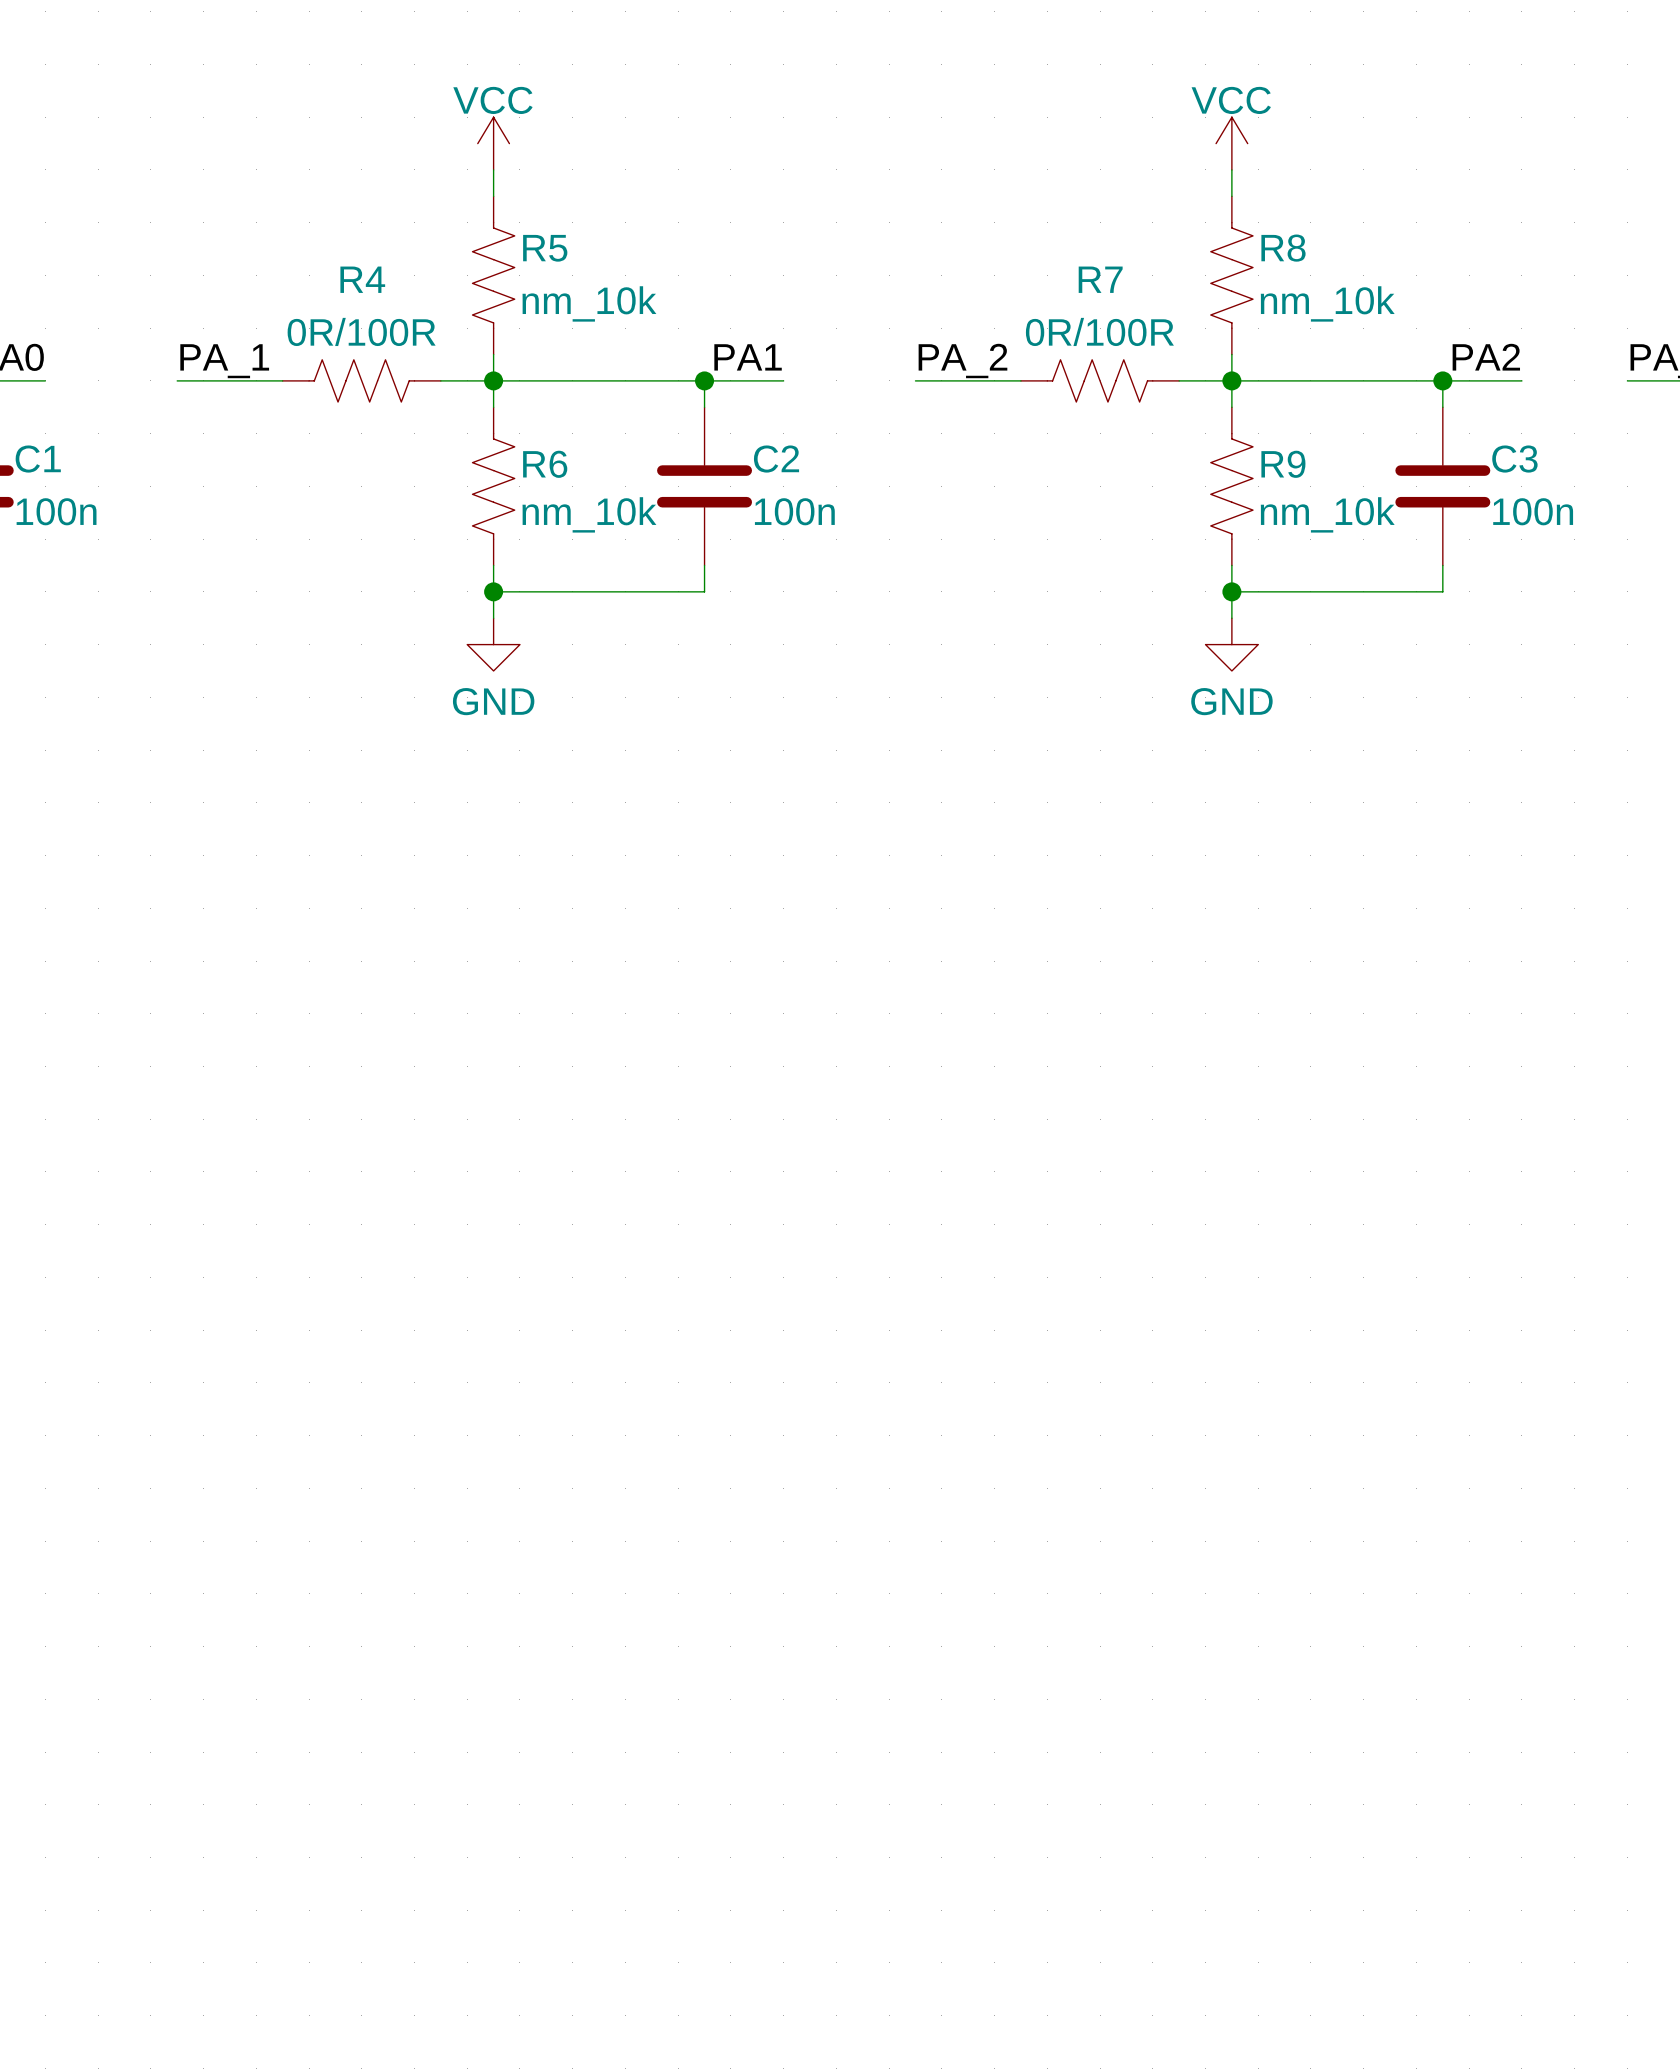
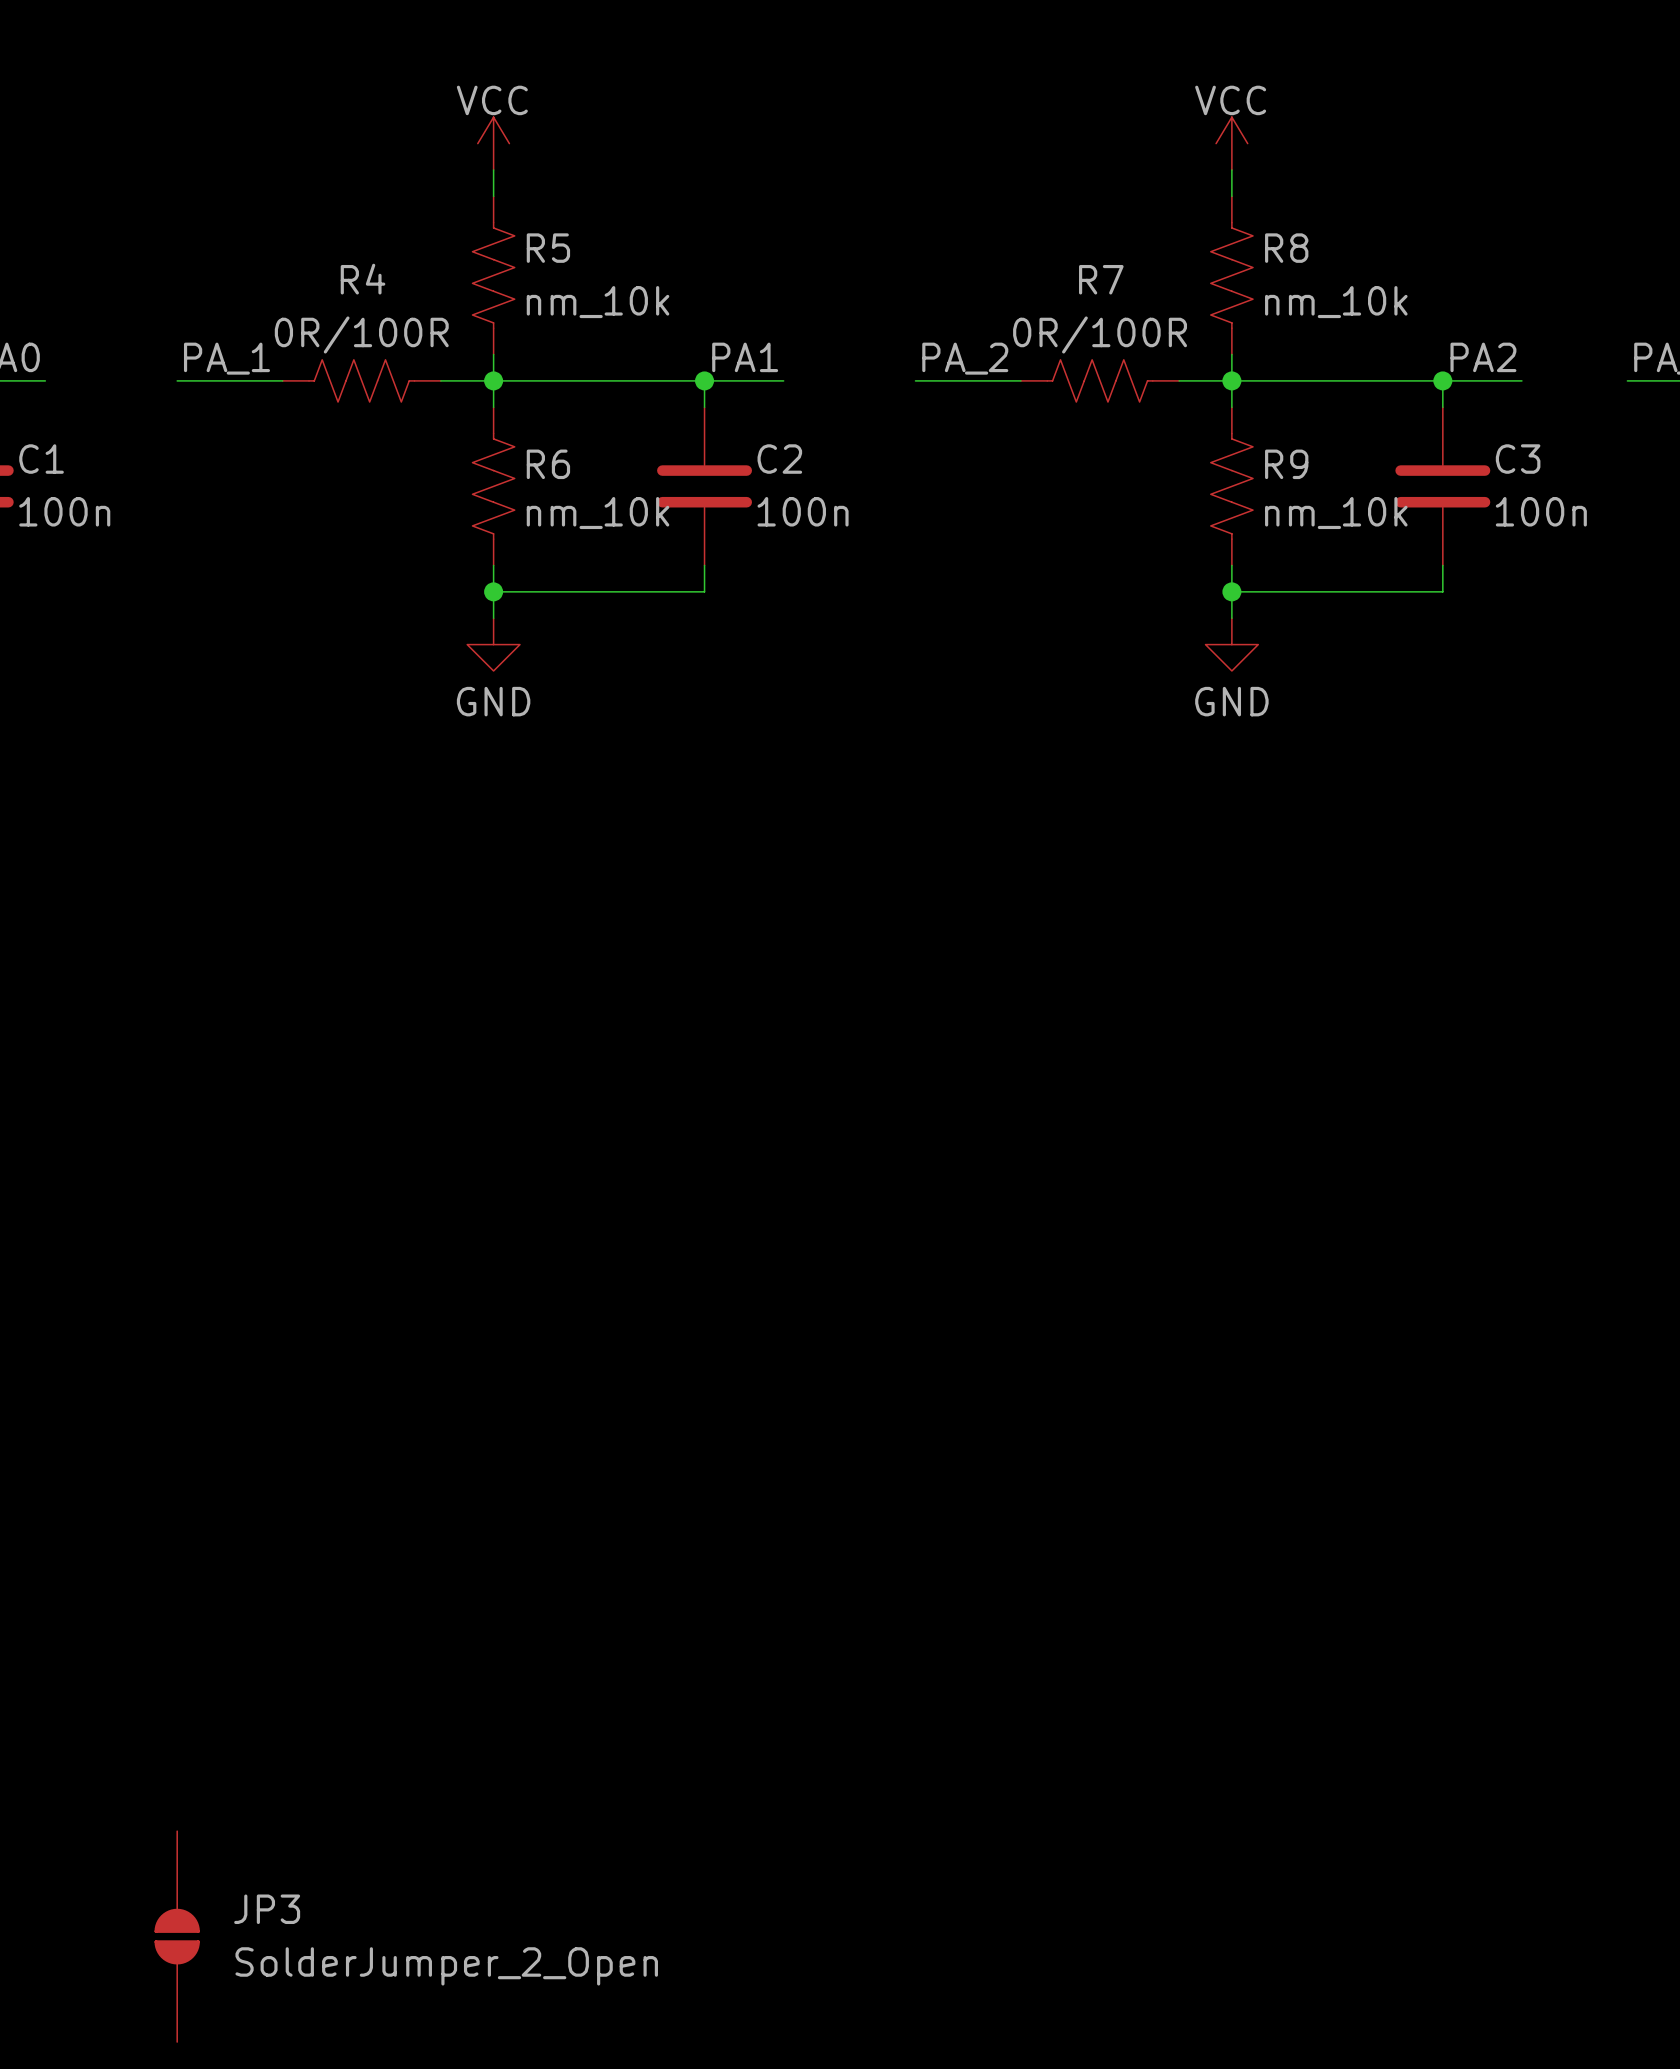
JP3: none -> SolderJumper_2_Open (177, 1936)

